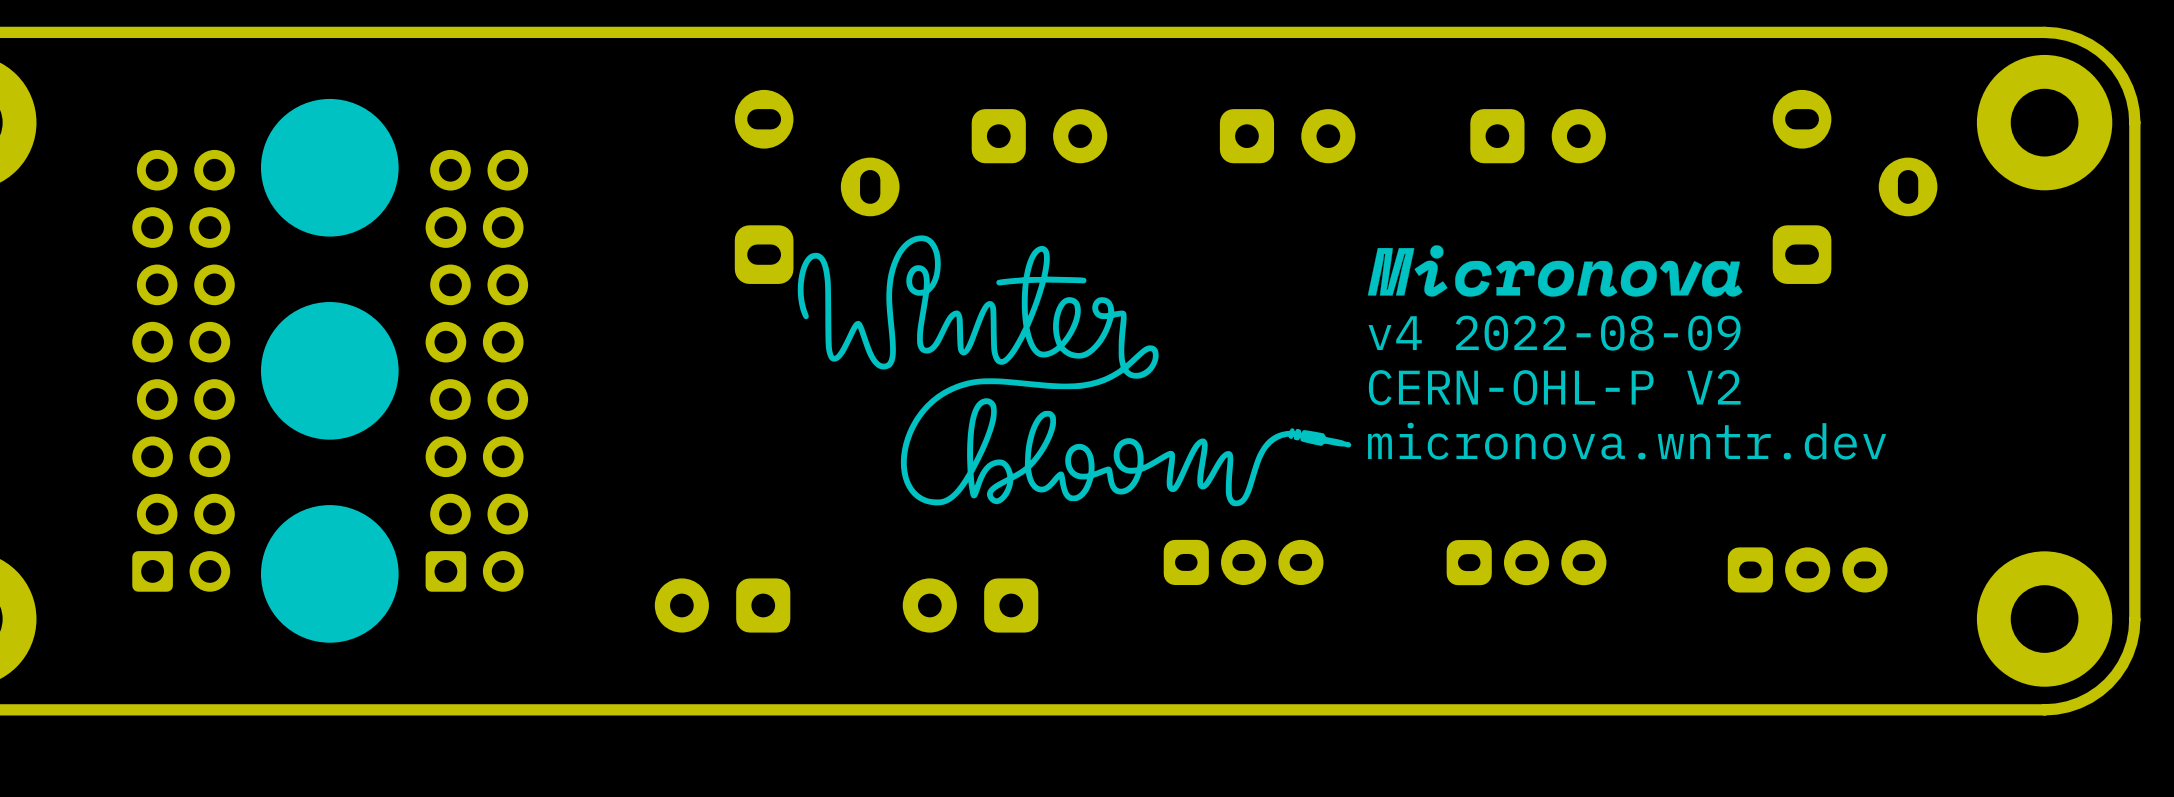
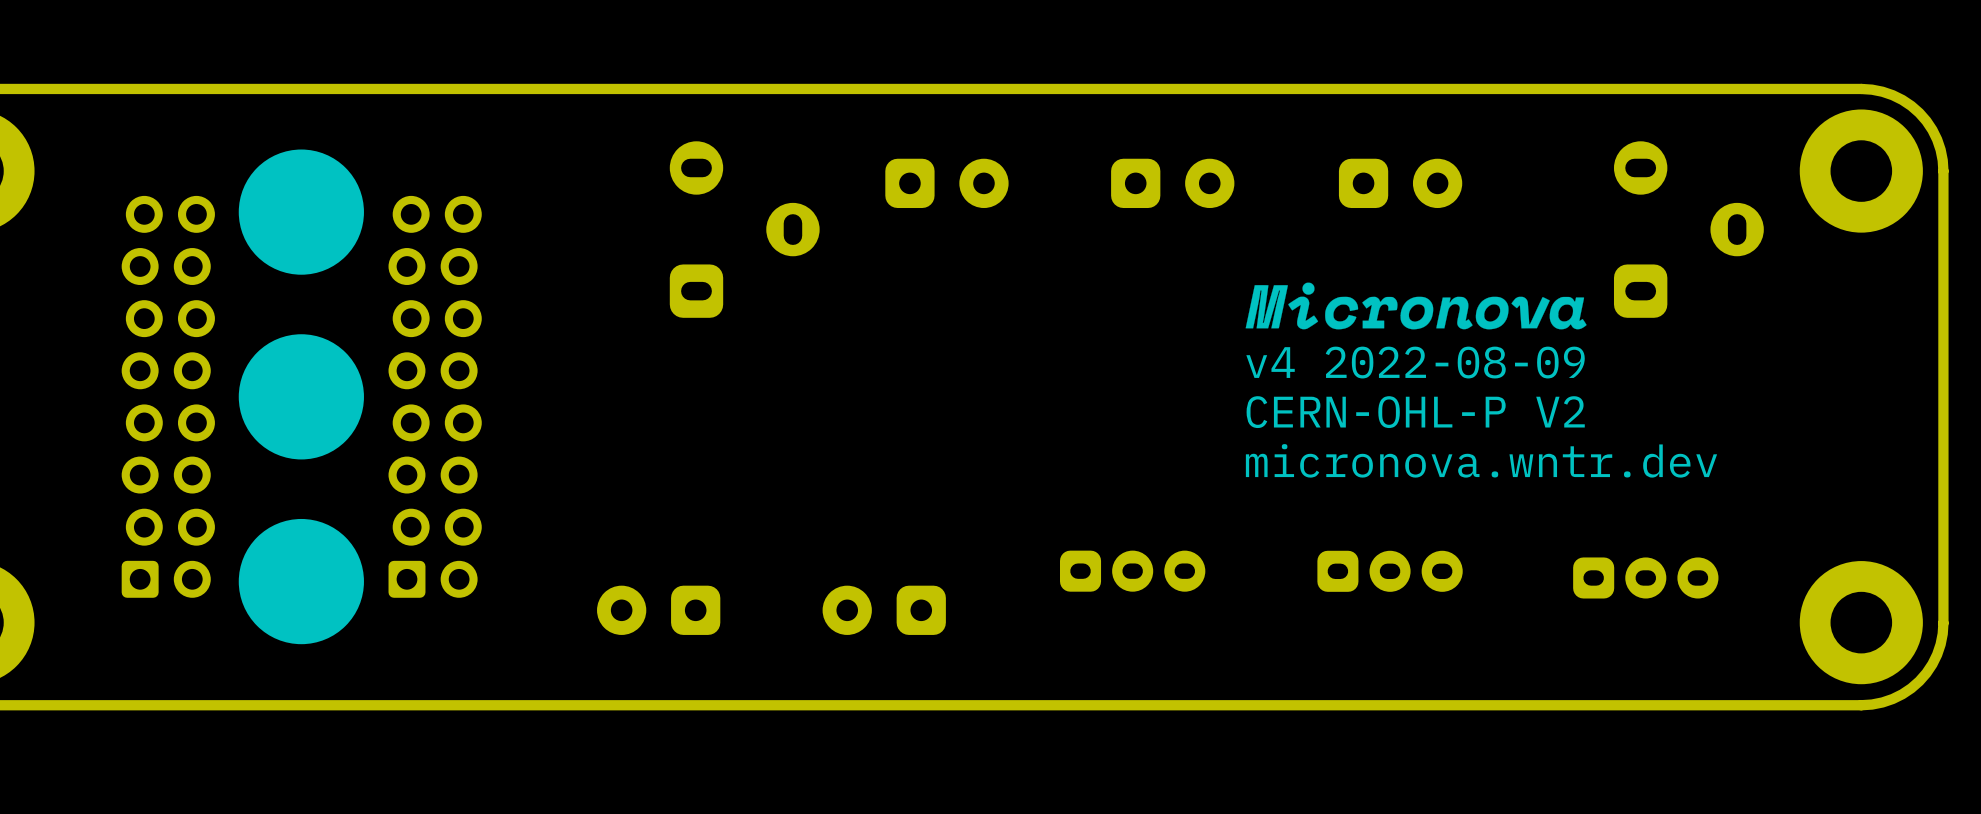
drawing: [797, 235, 1352, 507] -> none

